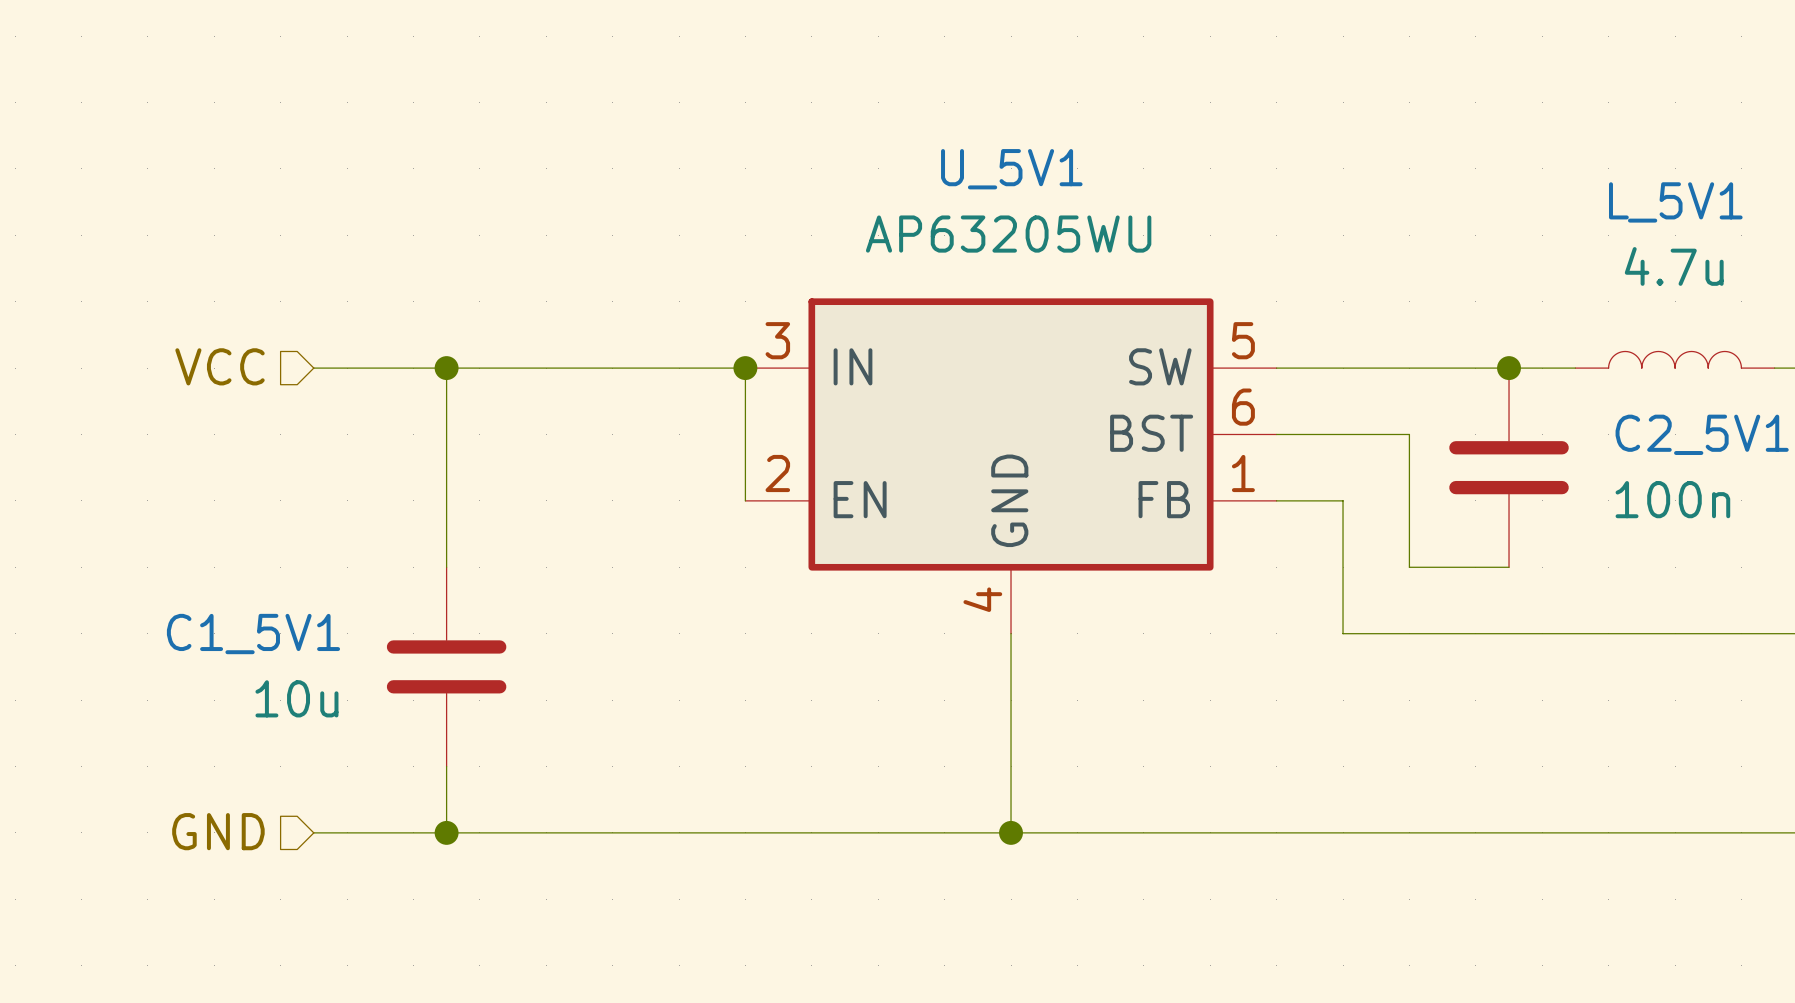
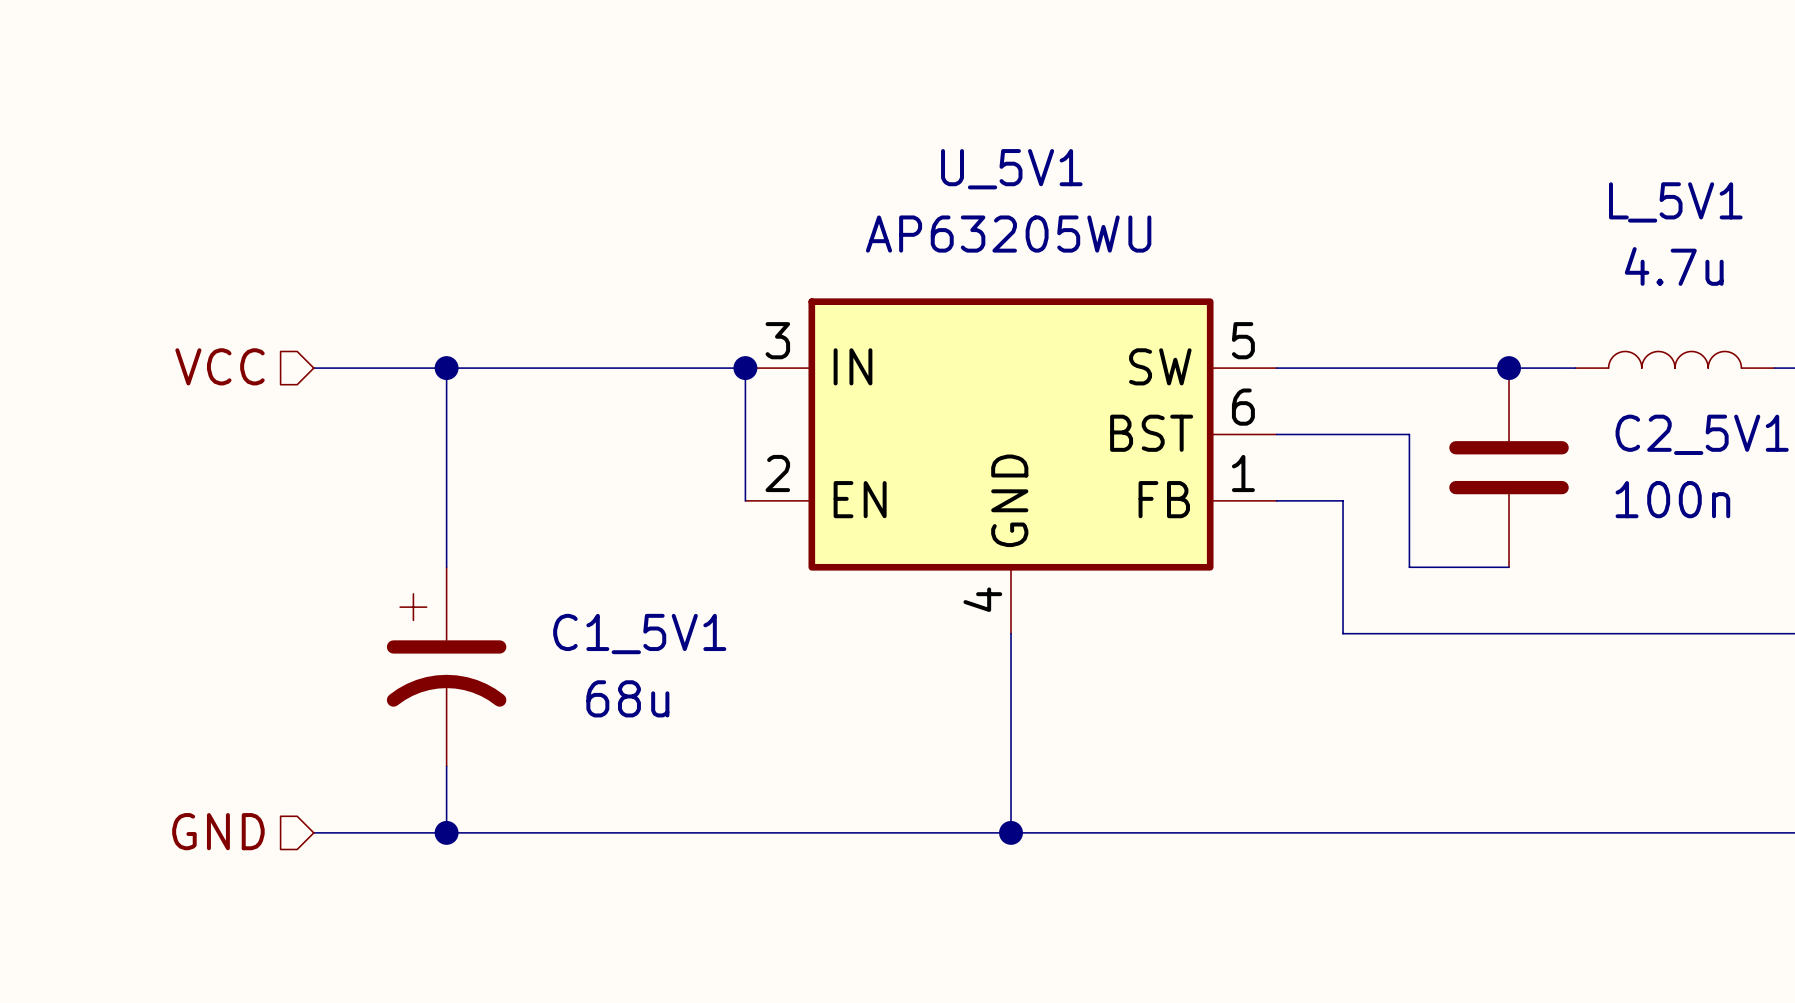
C1_5V1 symbol: [386, 567, 507, 767] -> [386, 567, 507, 767]
C1_5V1 name position: C1_5V1 (253, 634) -> C1_5V1 (639, 634)
C1_5V1 value: 10u (296, 698) -> 68u (627, 698)

